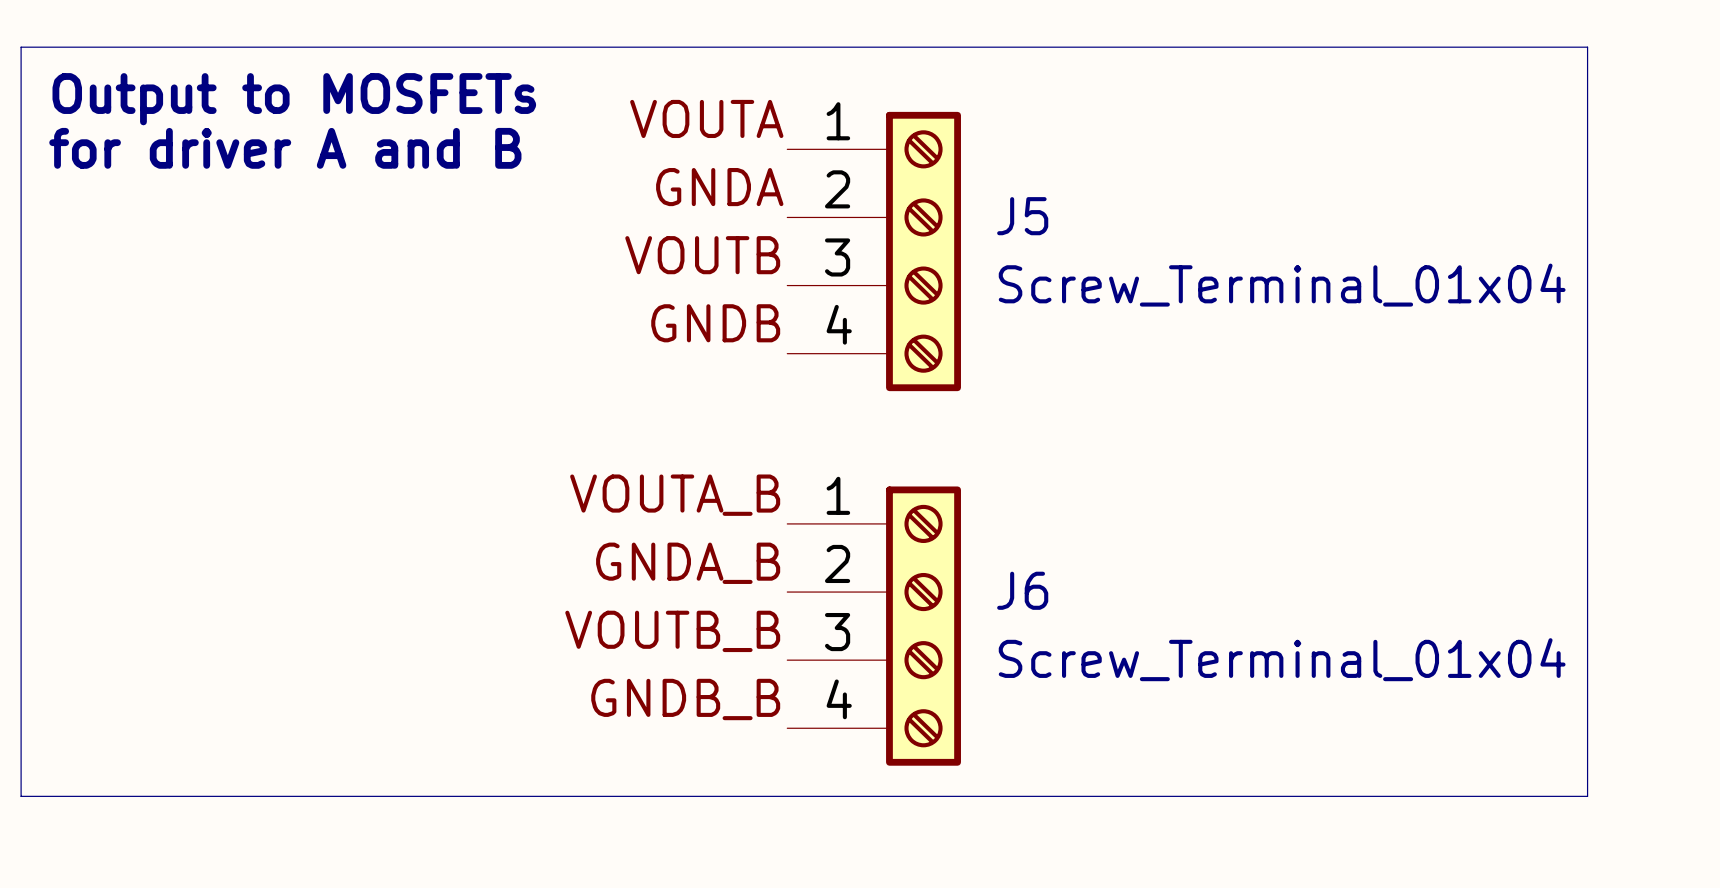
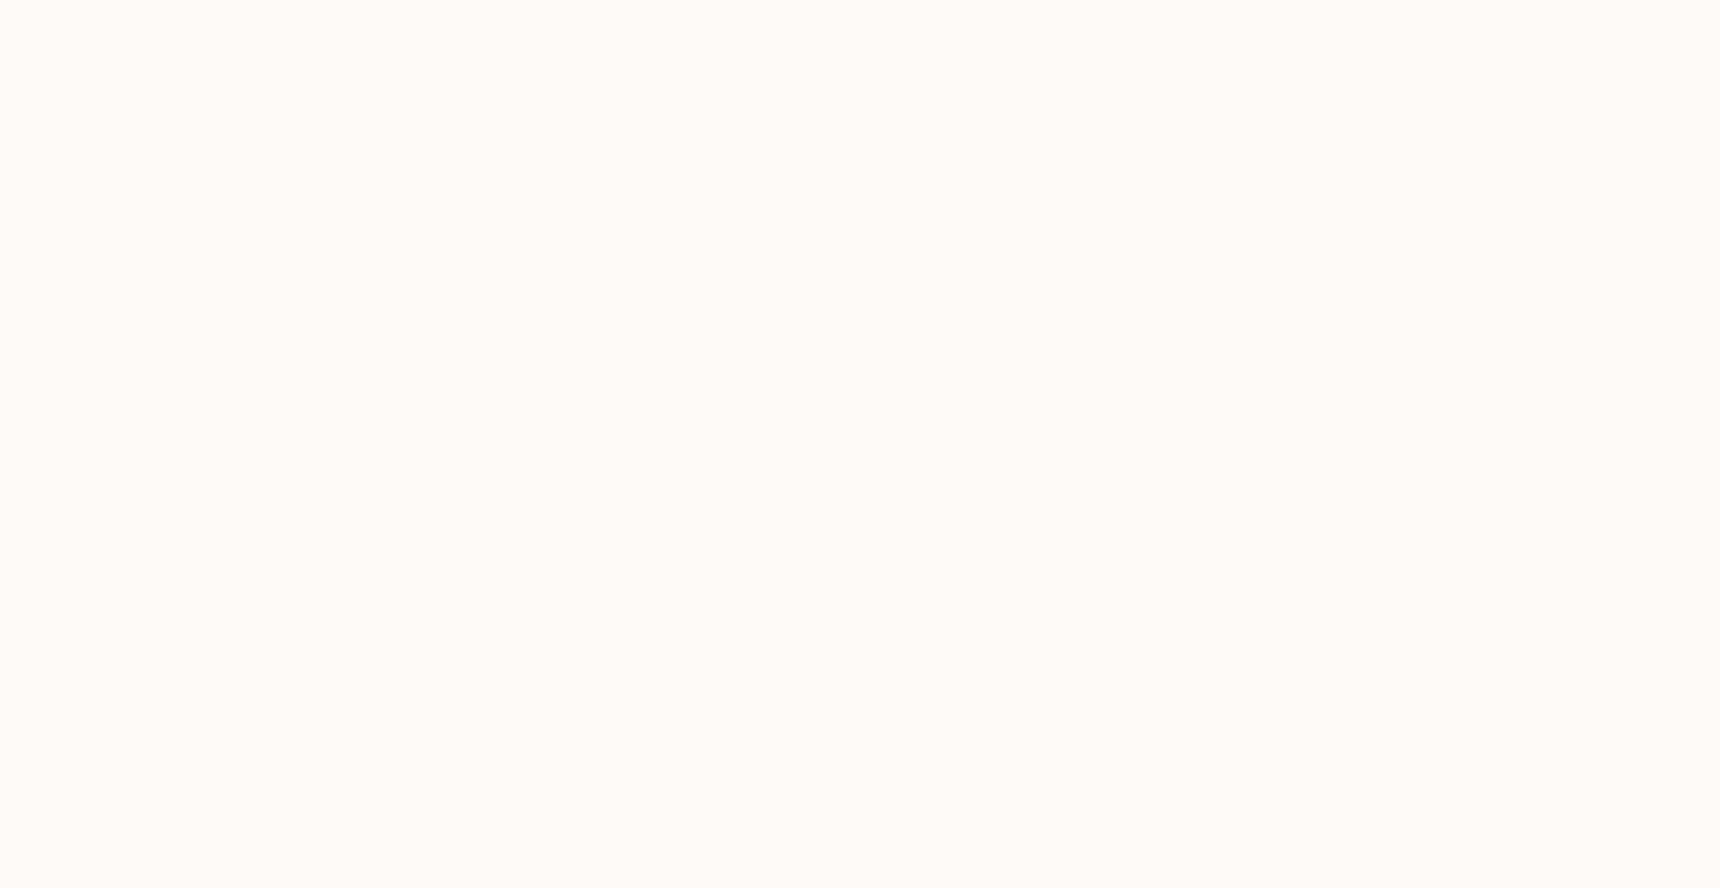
line: (21, 47) (1587, 47) (1587, 796) (21, 796) (21, 47) -> none
text: Output to MOSFETs (294, 99) -> none
label: VOUTA (706, 118) -> none
text: for driver A and B (285, 148) -> none
label: GNDA (719, 187) -> none
J5: Screw_Terminal_01x04 (874, 251) -> none
label: VOUTB (702, 255) -> none
label: GNDB (715, 323) -> none
label: VOUTA_B (675, 495) -> none
label: GNDA_B (688, 563) -> none
J6: Screw_Terminal_01x04 (874, 626) -> none
label: VOUTB_B (672, 631) -> none
label: GNDB_B (685, 699) -> none

